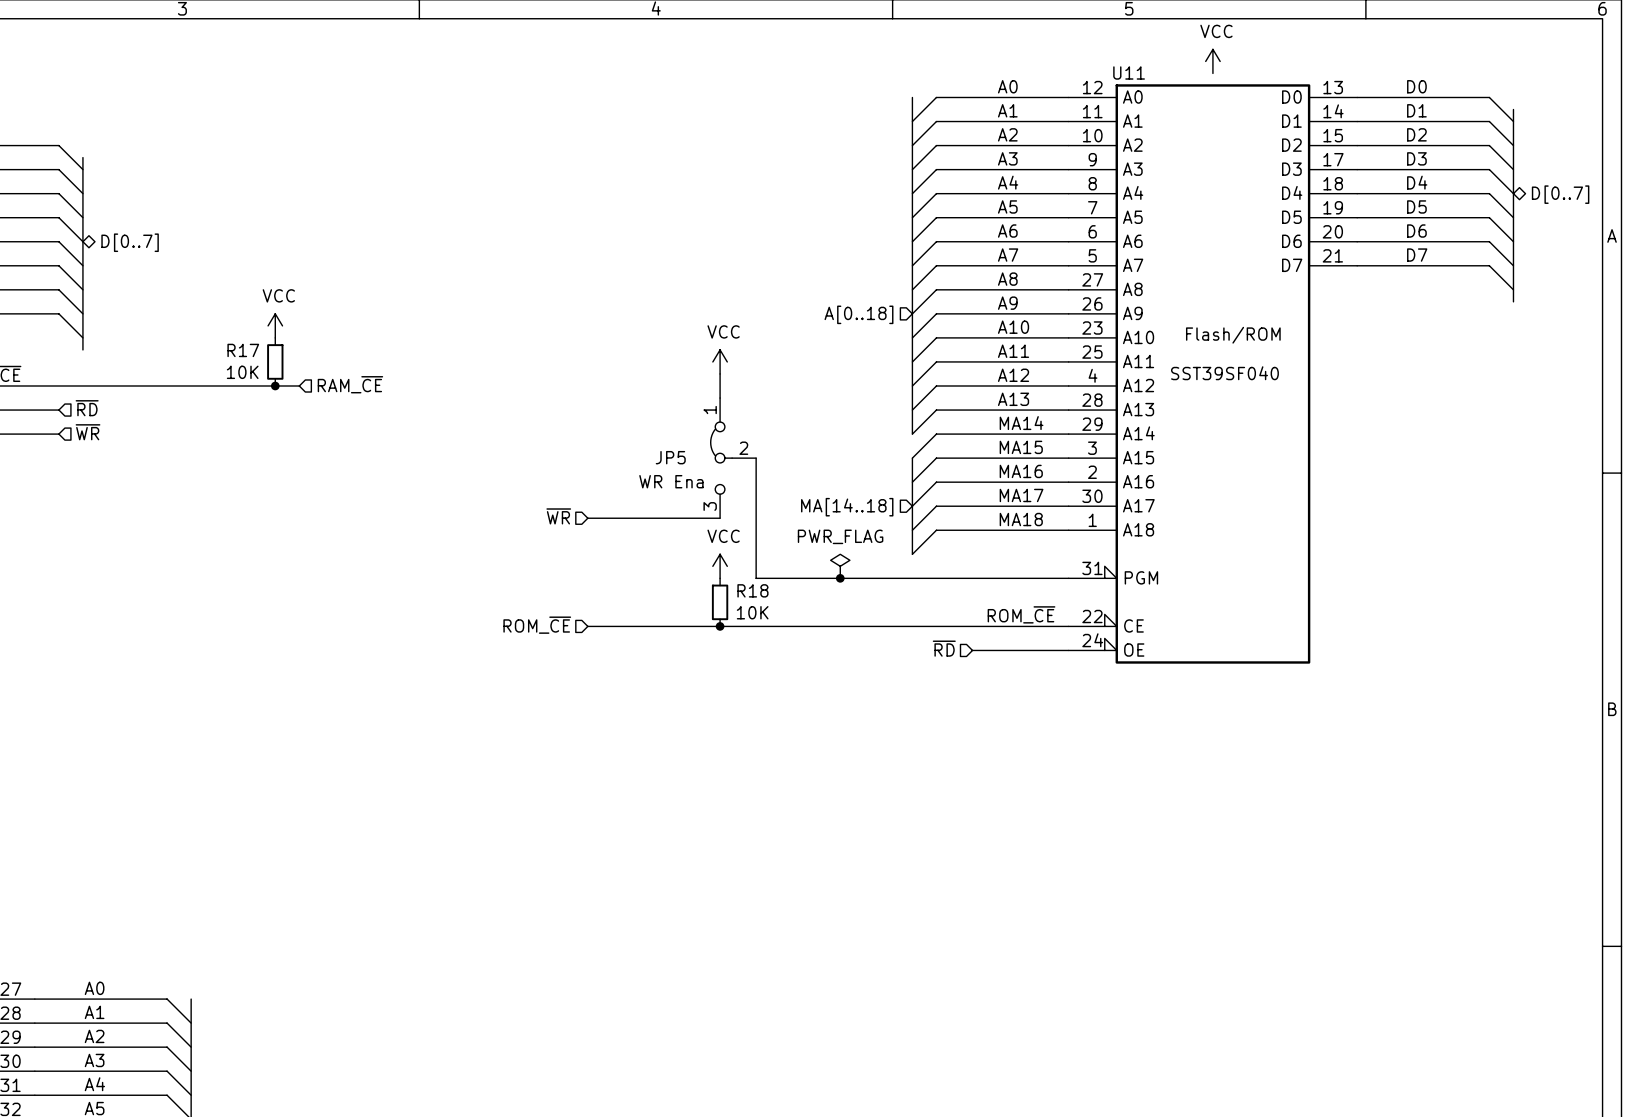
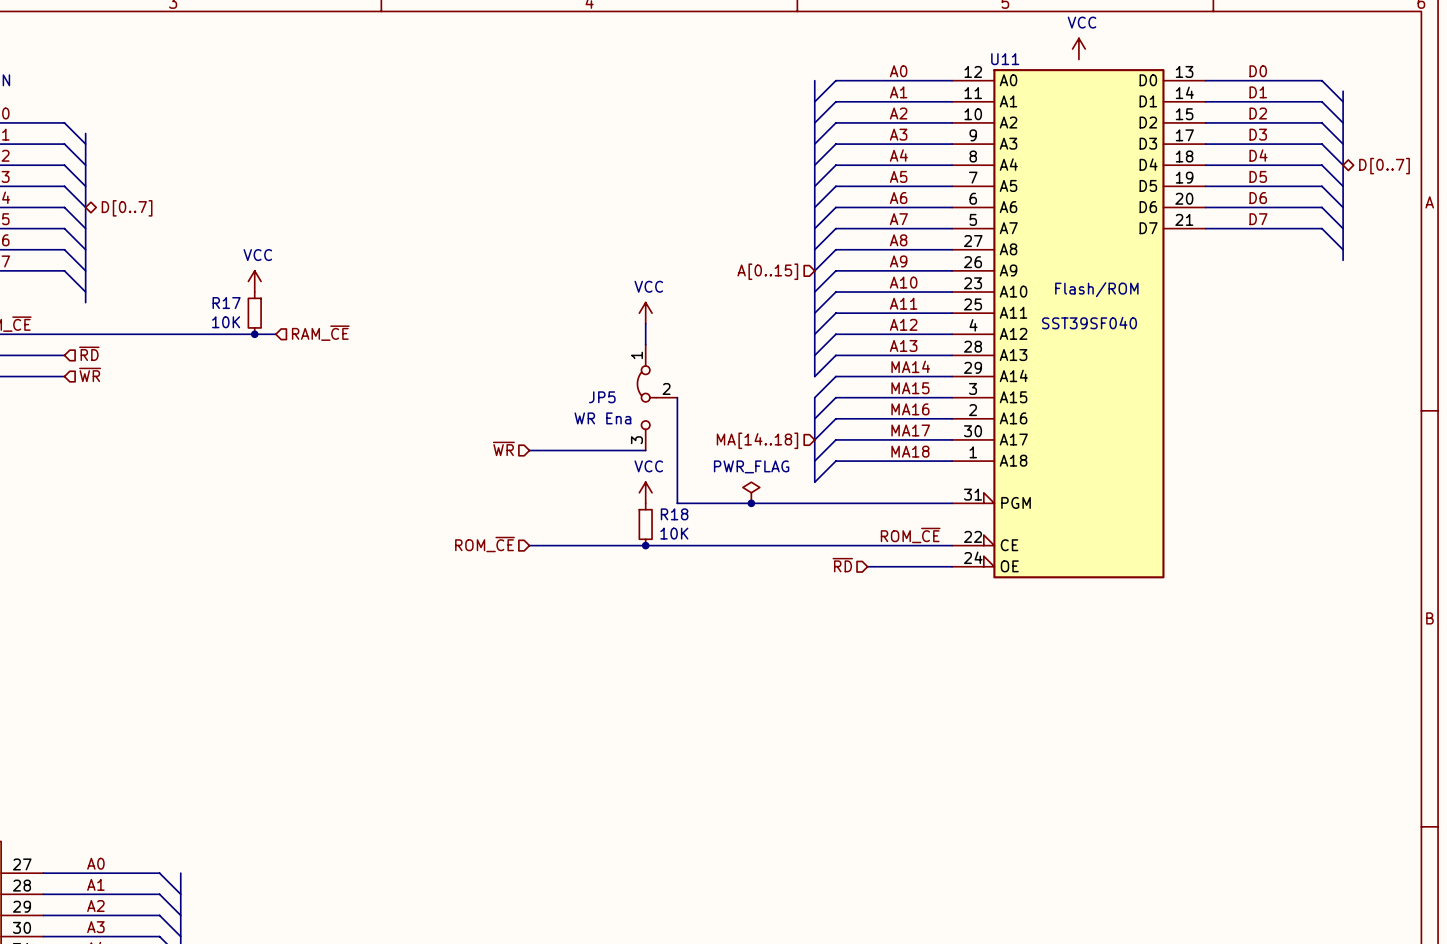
hierarchical label: A[0..18] (858, 314) -> A[0..15] (767, 271)

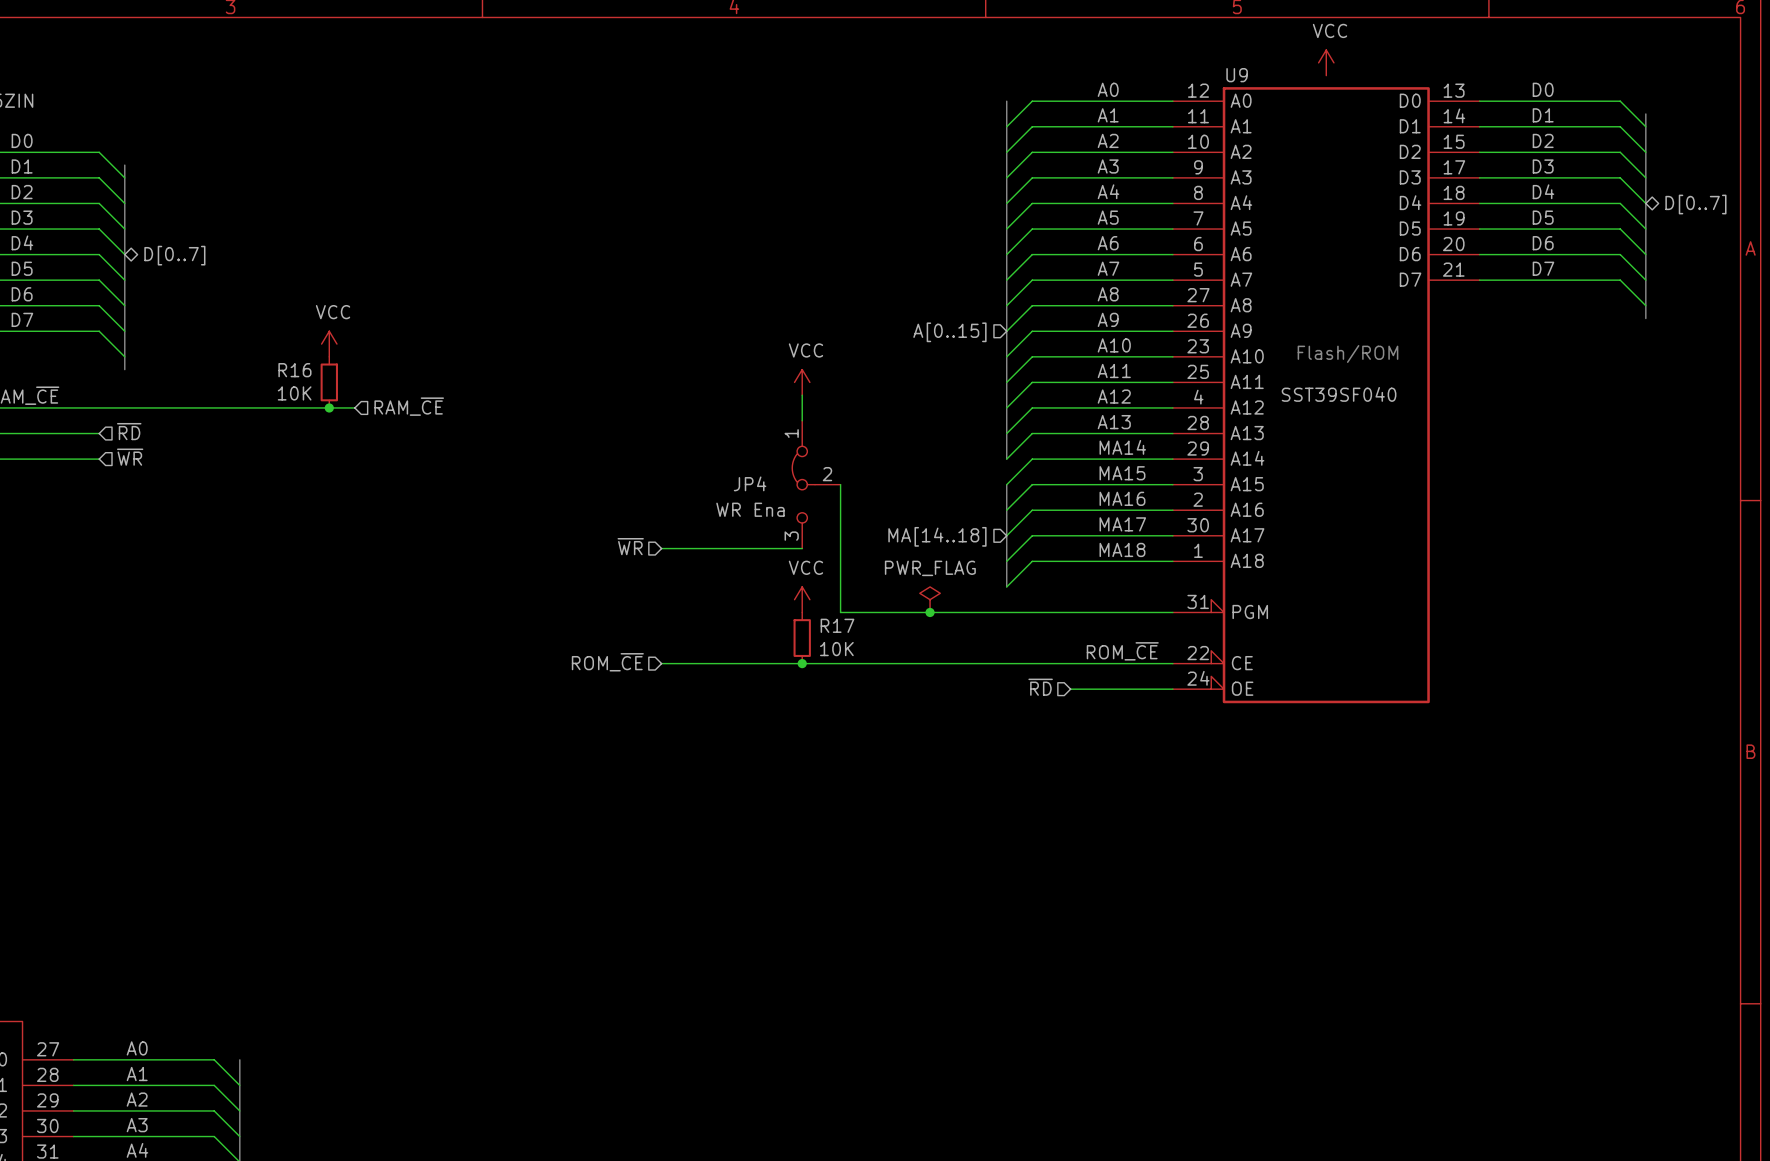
U11 name: U11 (1005, 59) -> U9 (1237, 75)
R17 name: R17 (226, 303) -> R16 (294, 370)
JP5 name: JP5 (602, 397) -> JP4 (750, 483)
R18 name: R18 (674, 514) -> R17 (837, 625)

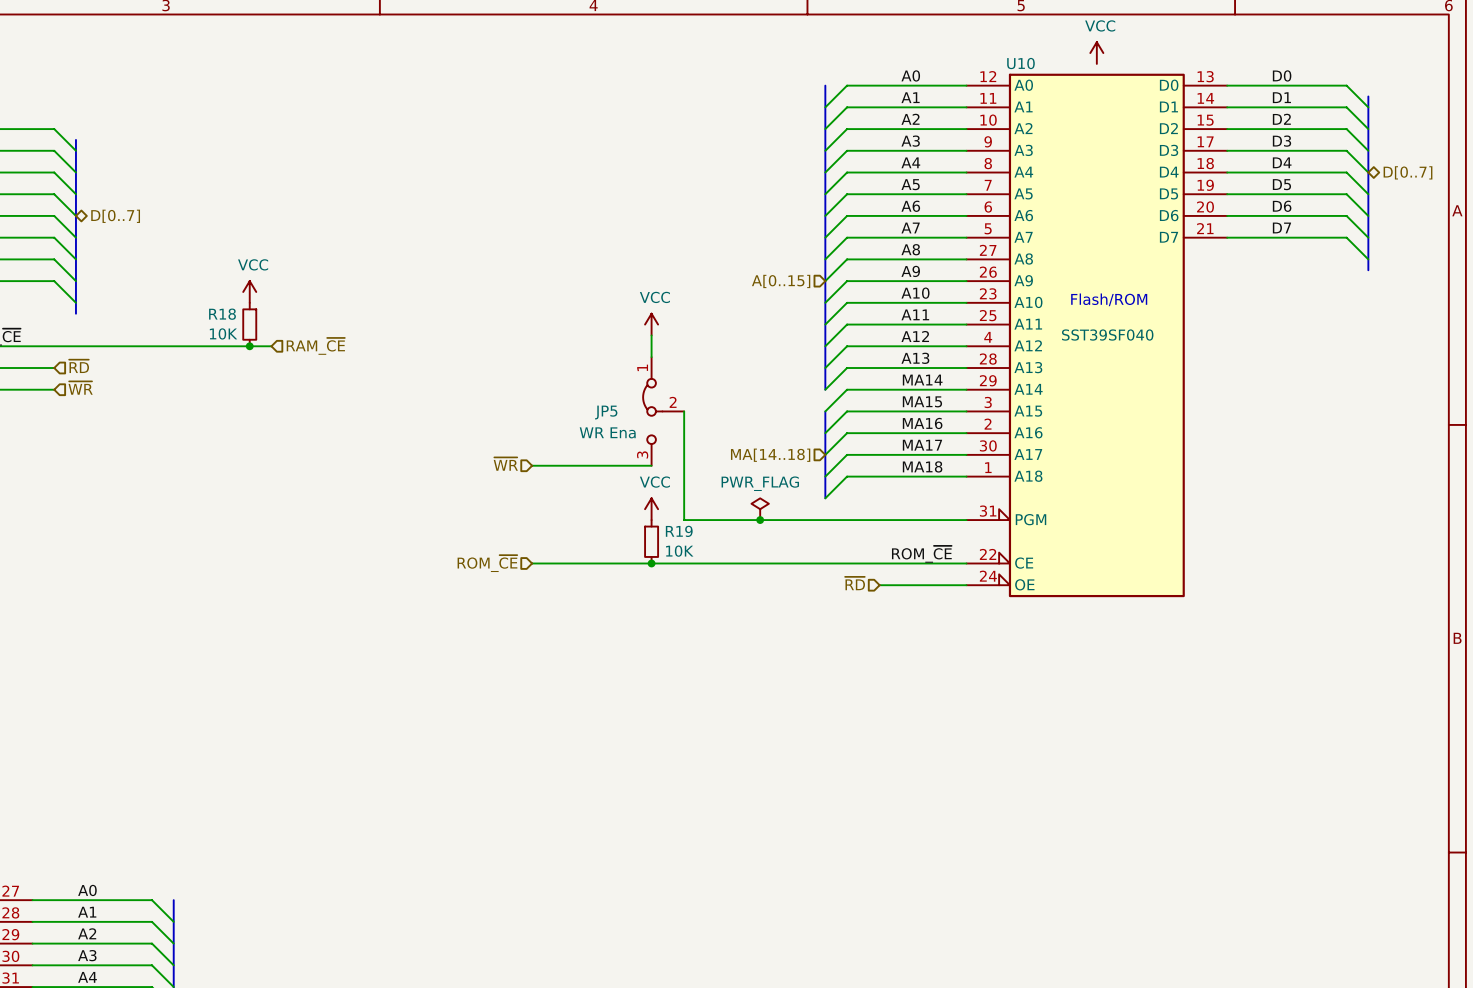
U9 name: U9 (1237, 75) -> U10 (1020, 63)
R16 name: R16 (294, 370) -> R18 (222, 314)
JP4 name: JP4 (750, 483) -> JP5 (606, 412)
R17 name: R17 (837, 625) -> R19 (679, 531)

